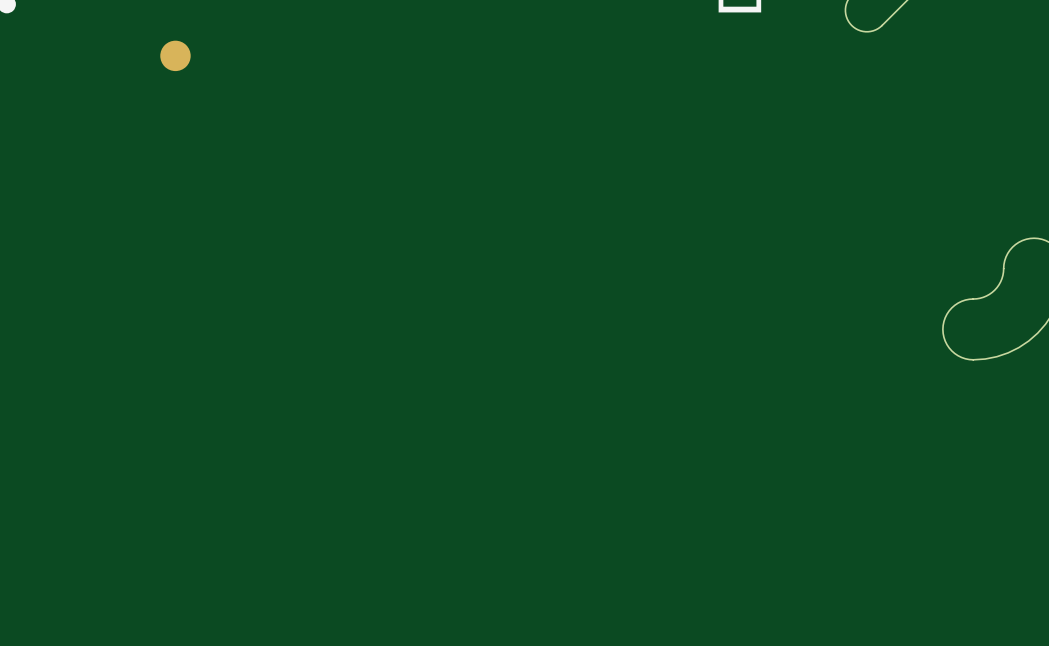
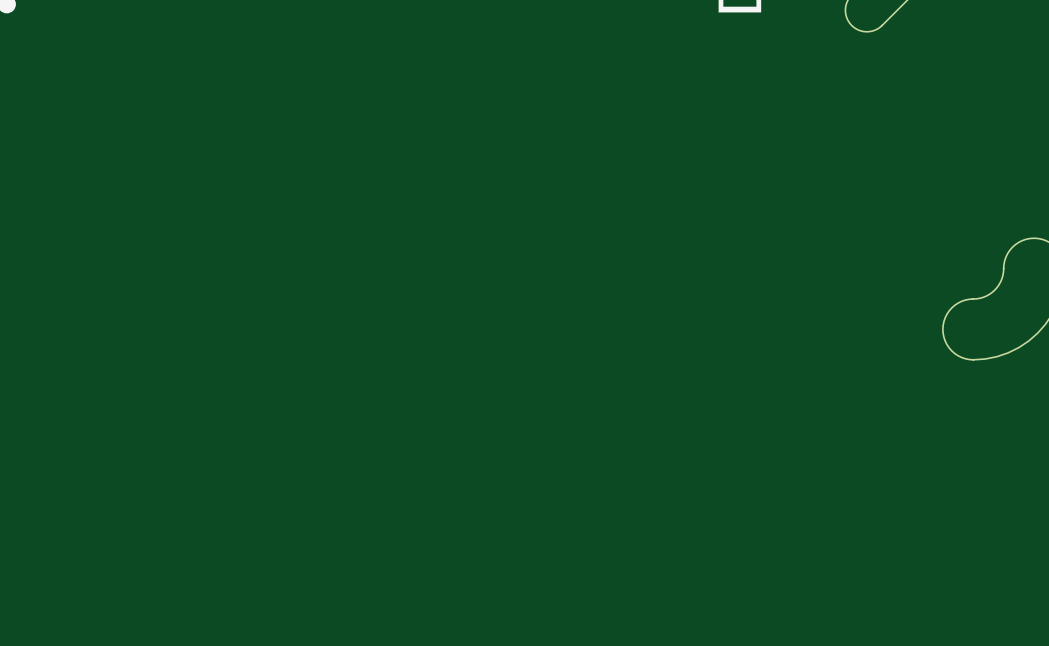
part: (175, 55) -> none

